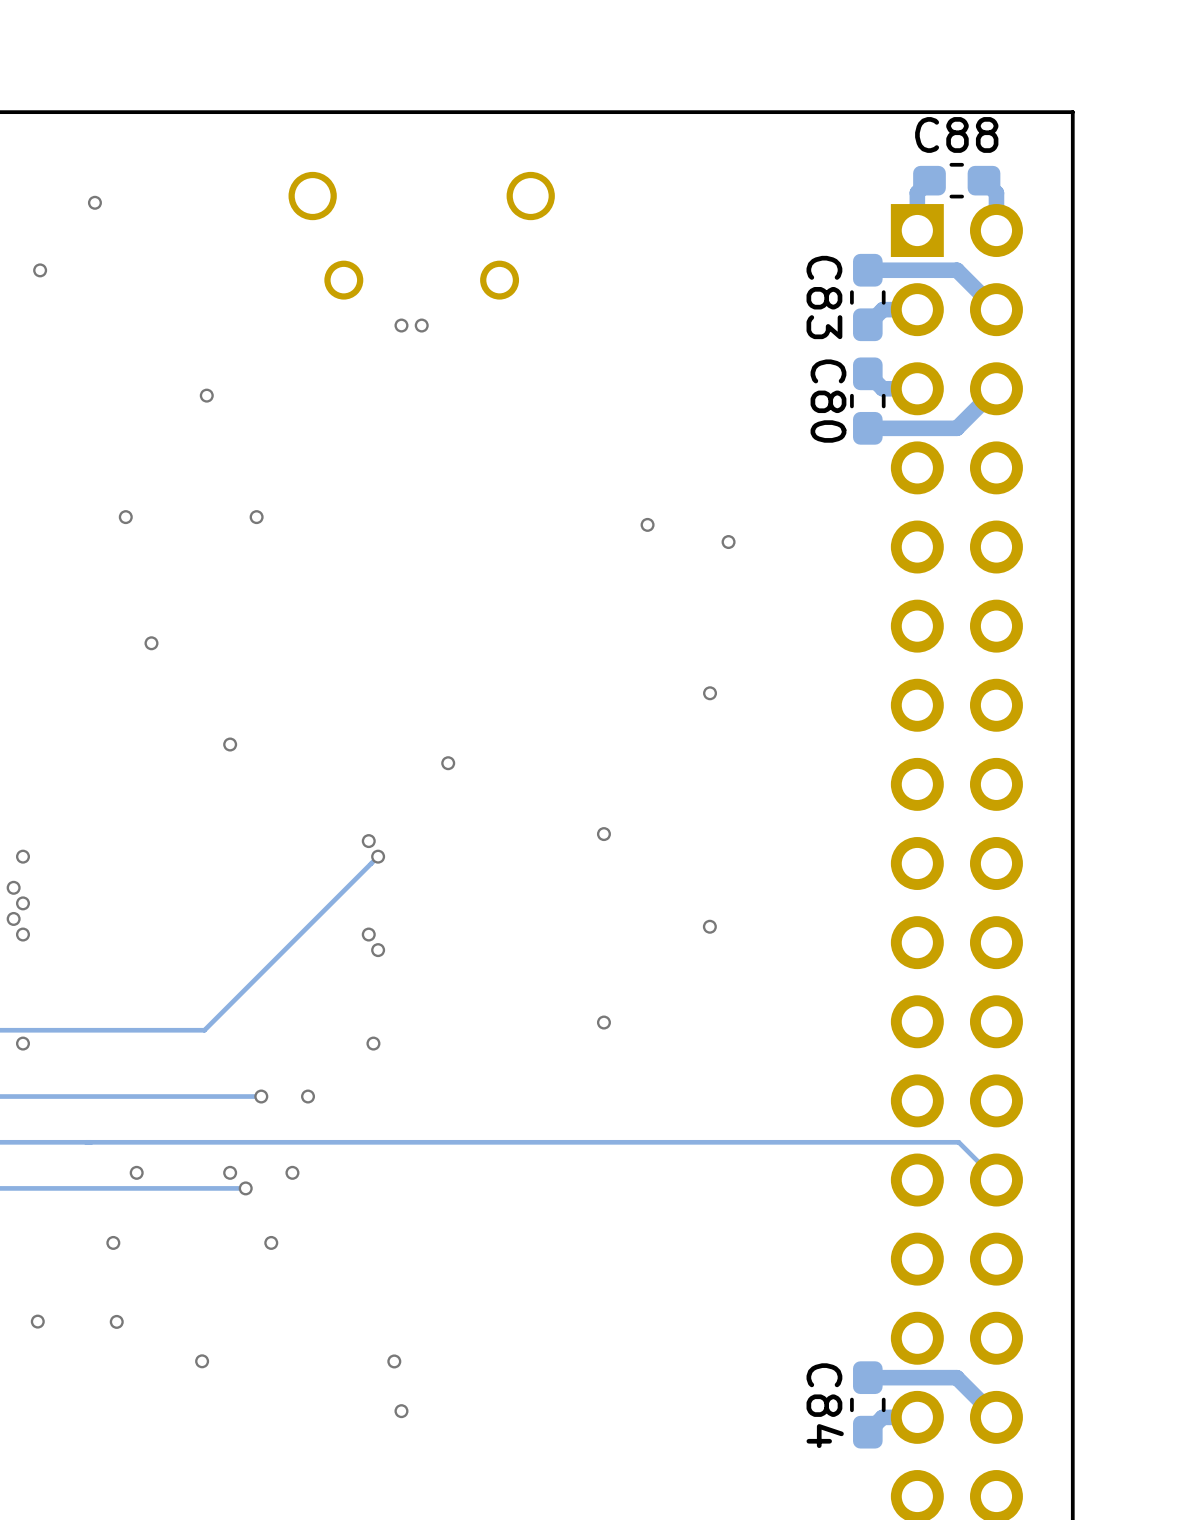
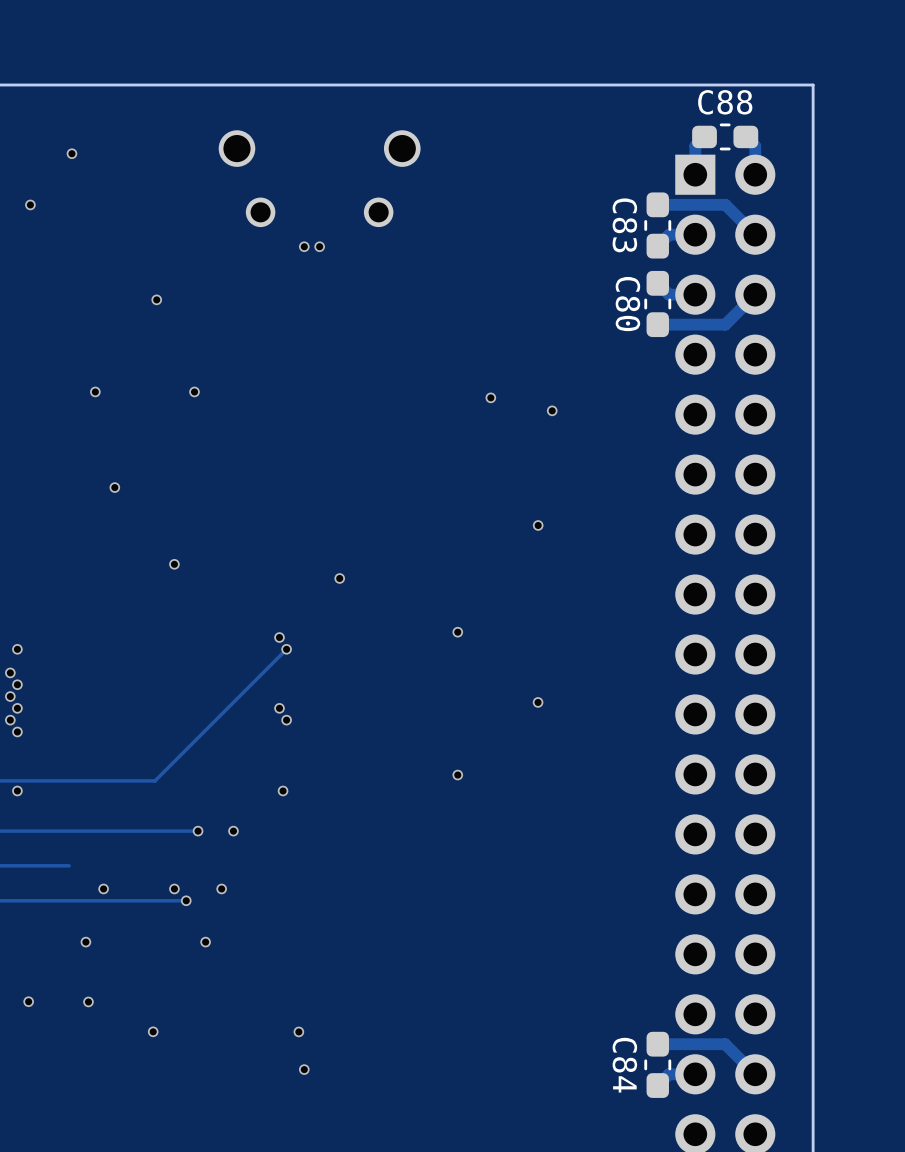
via: none -> (10, 720)
via: none -> (17, 731)
track: (91, 1142) (958, 1142) (996, 1180) -> none

